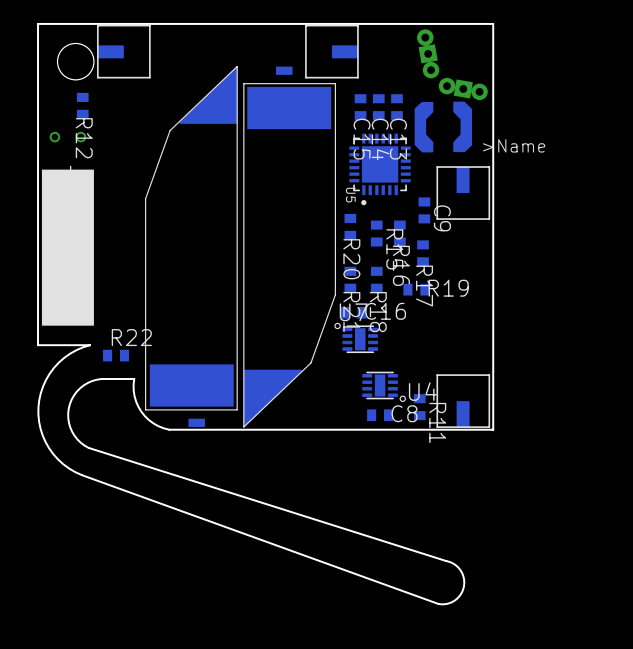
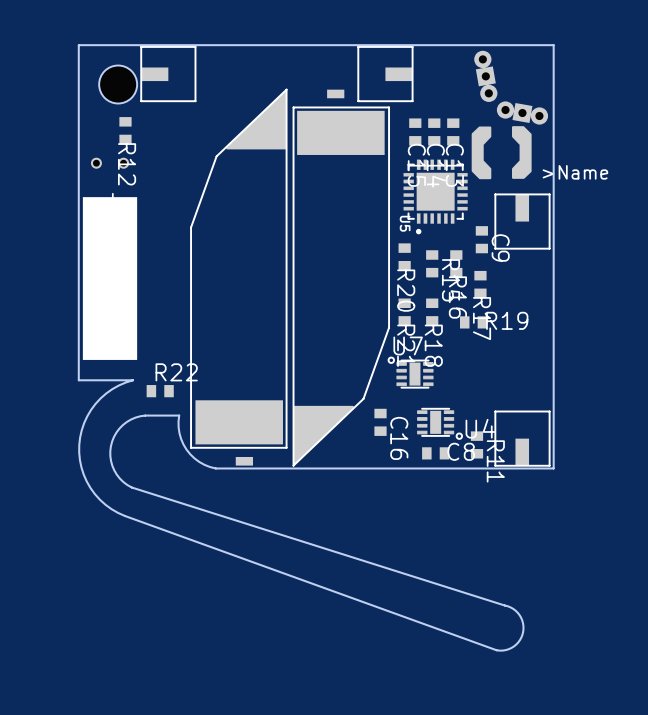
C16 rotation: 0° (353, 312) -> 90° clockwise (380, 422)
C16 position: (353, 312) -> (380, 422)

